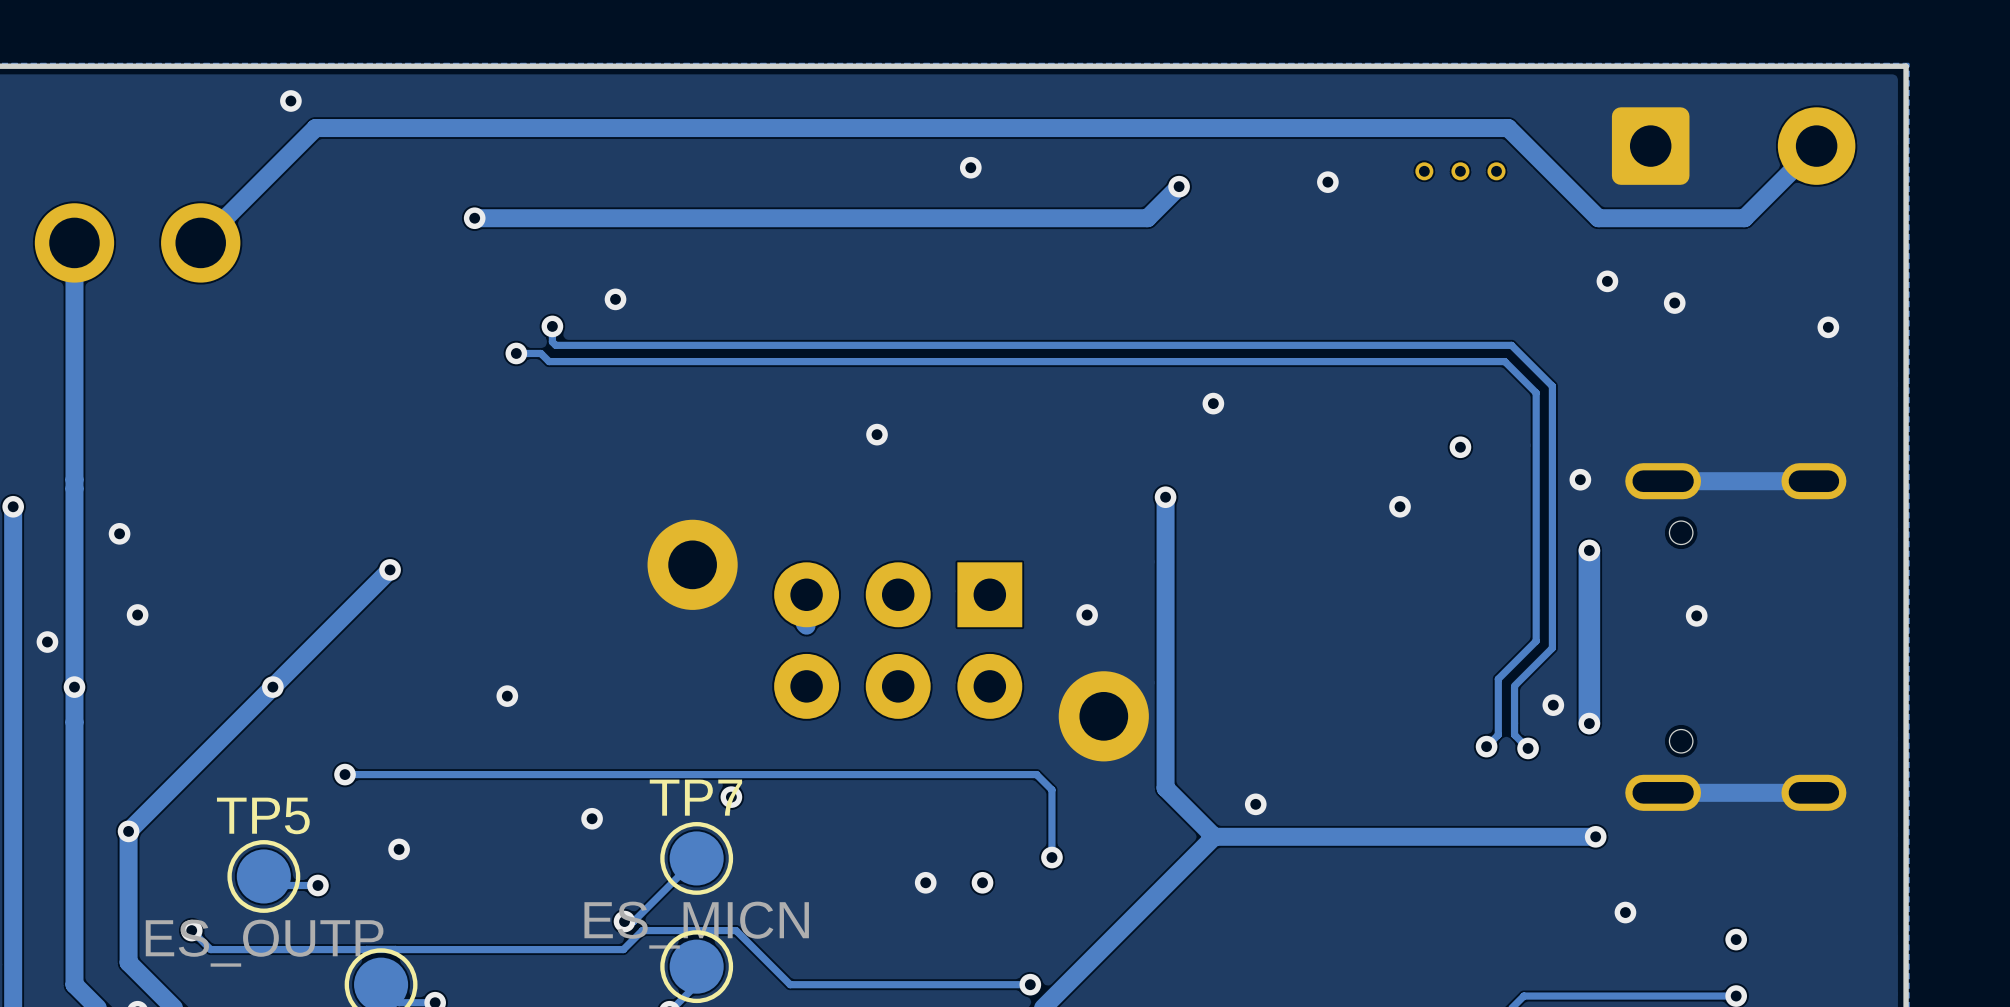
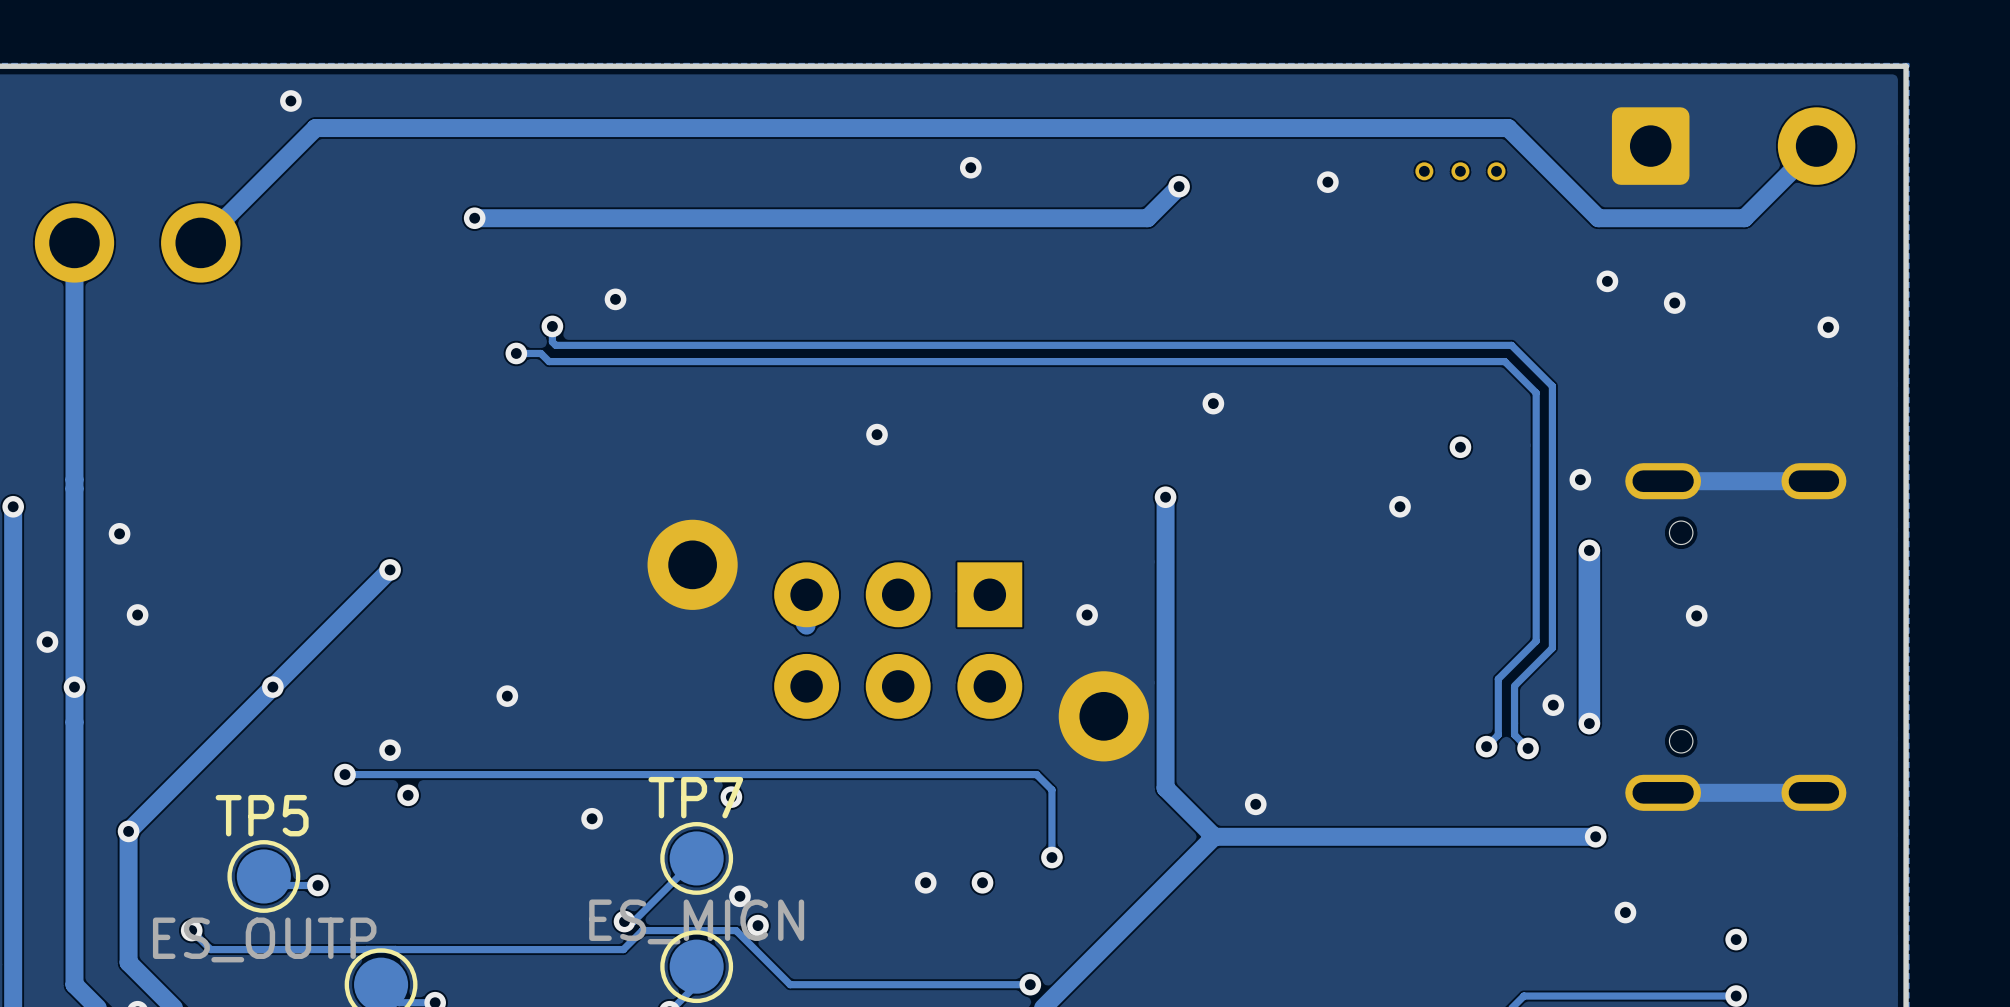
via: none -> (390, 750)
via: none -> (408, 795)
via: (399, 849) -> none
via: none -> (739, 896)
via: none -> (757, 925)

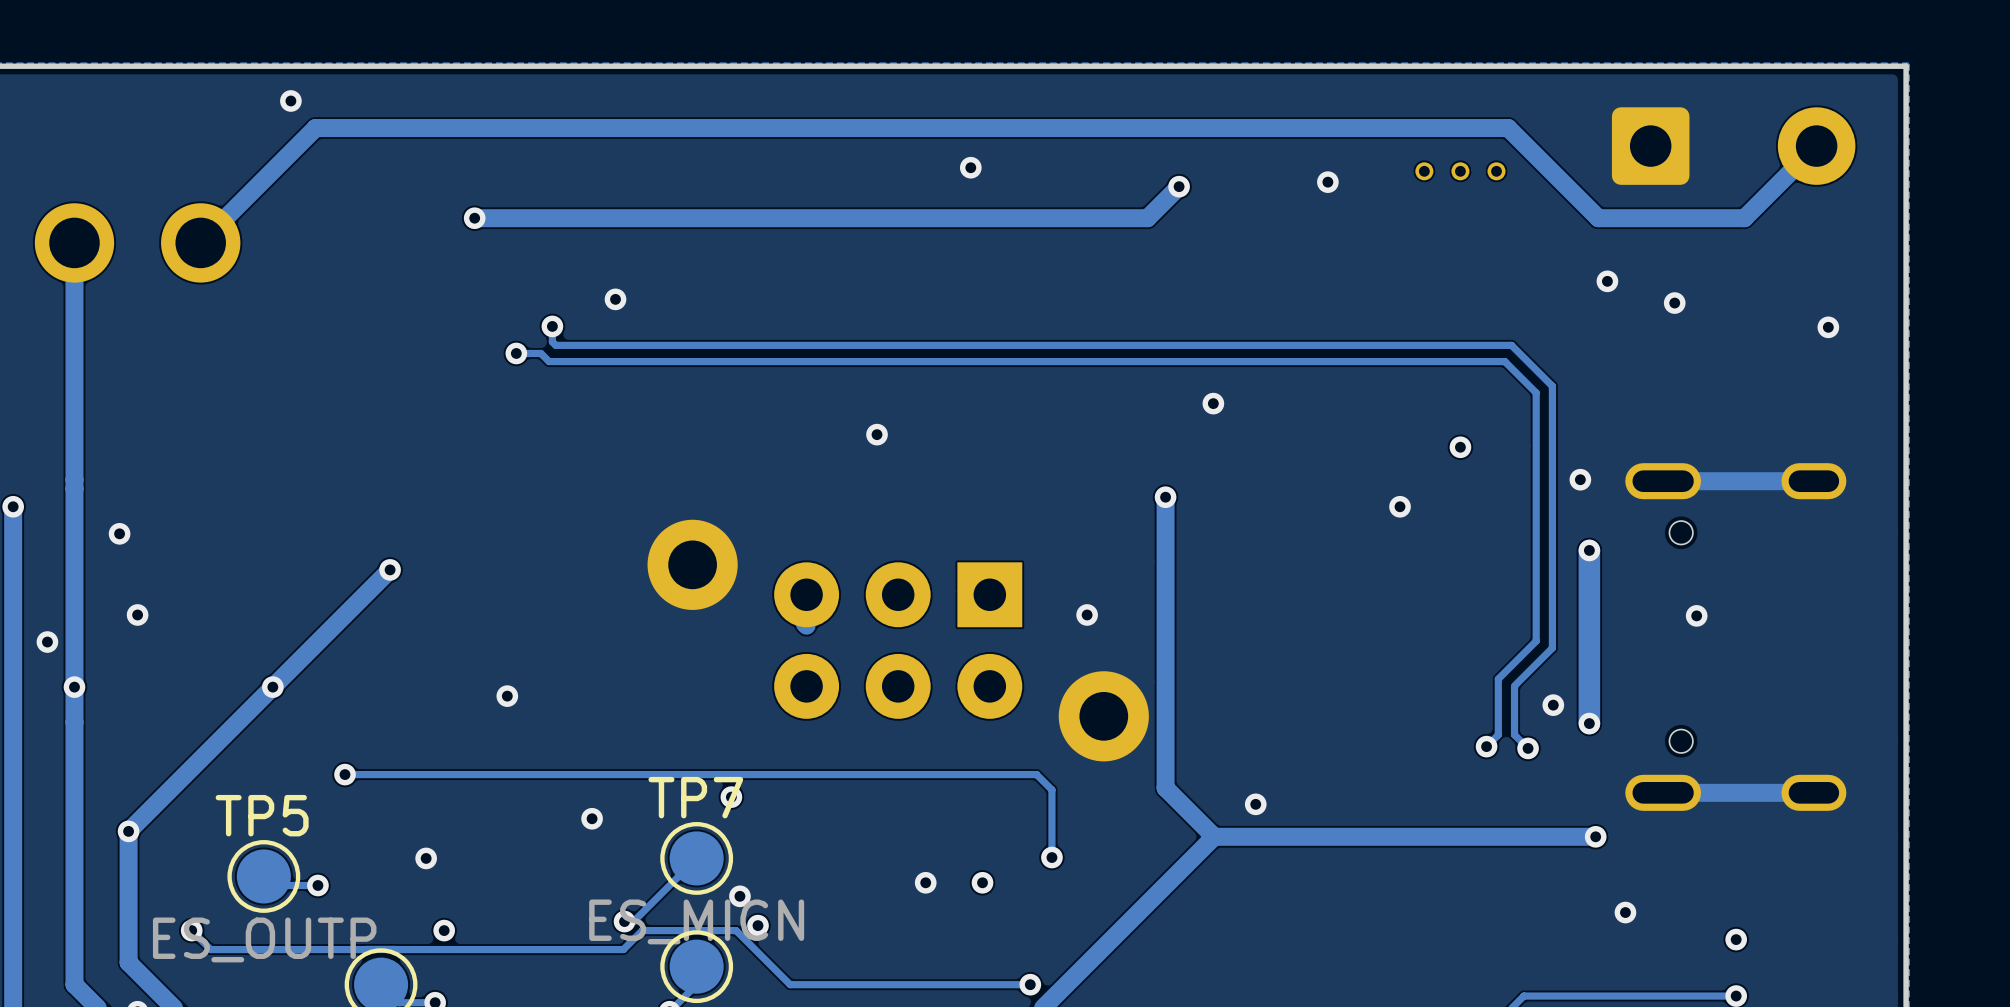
via: (390, 750) -> none
via: (408, 795) -> none
via: none -> (426, 858)
via: none -> (444, 930)

